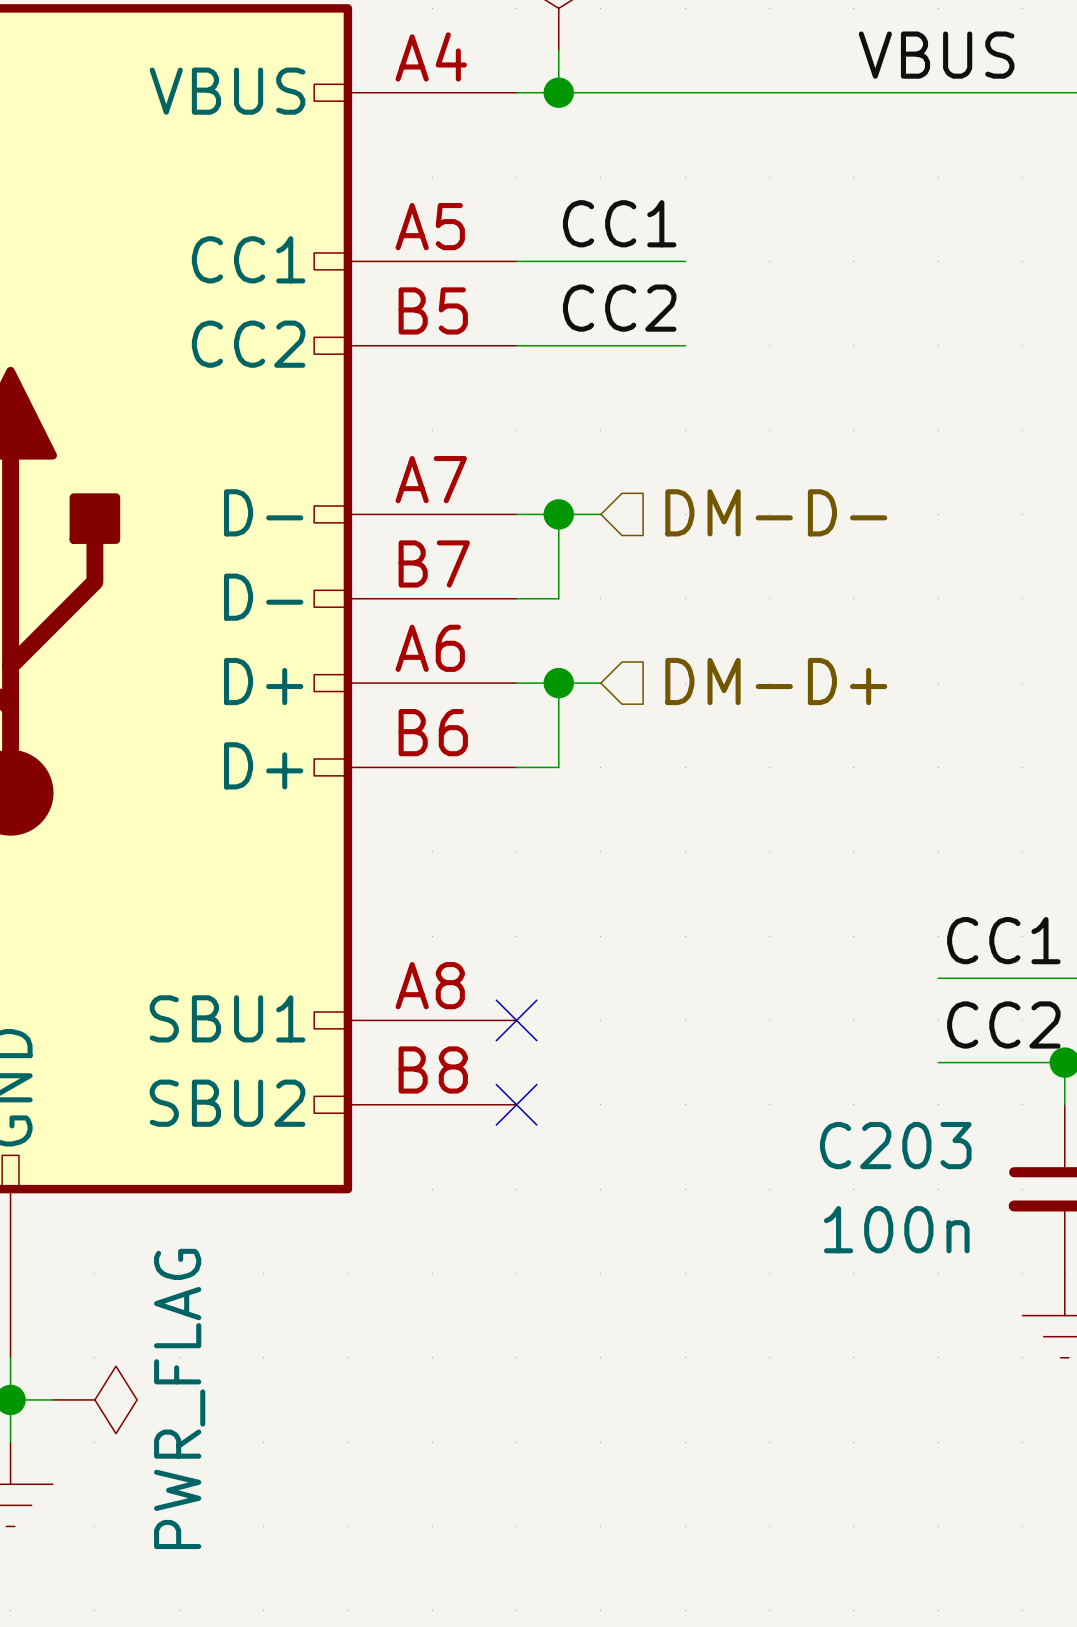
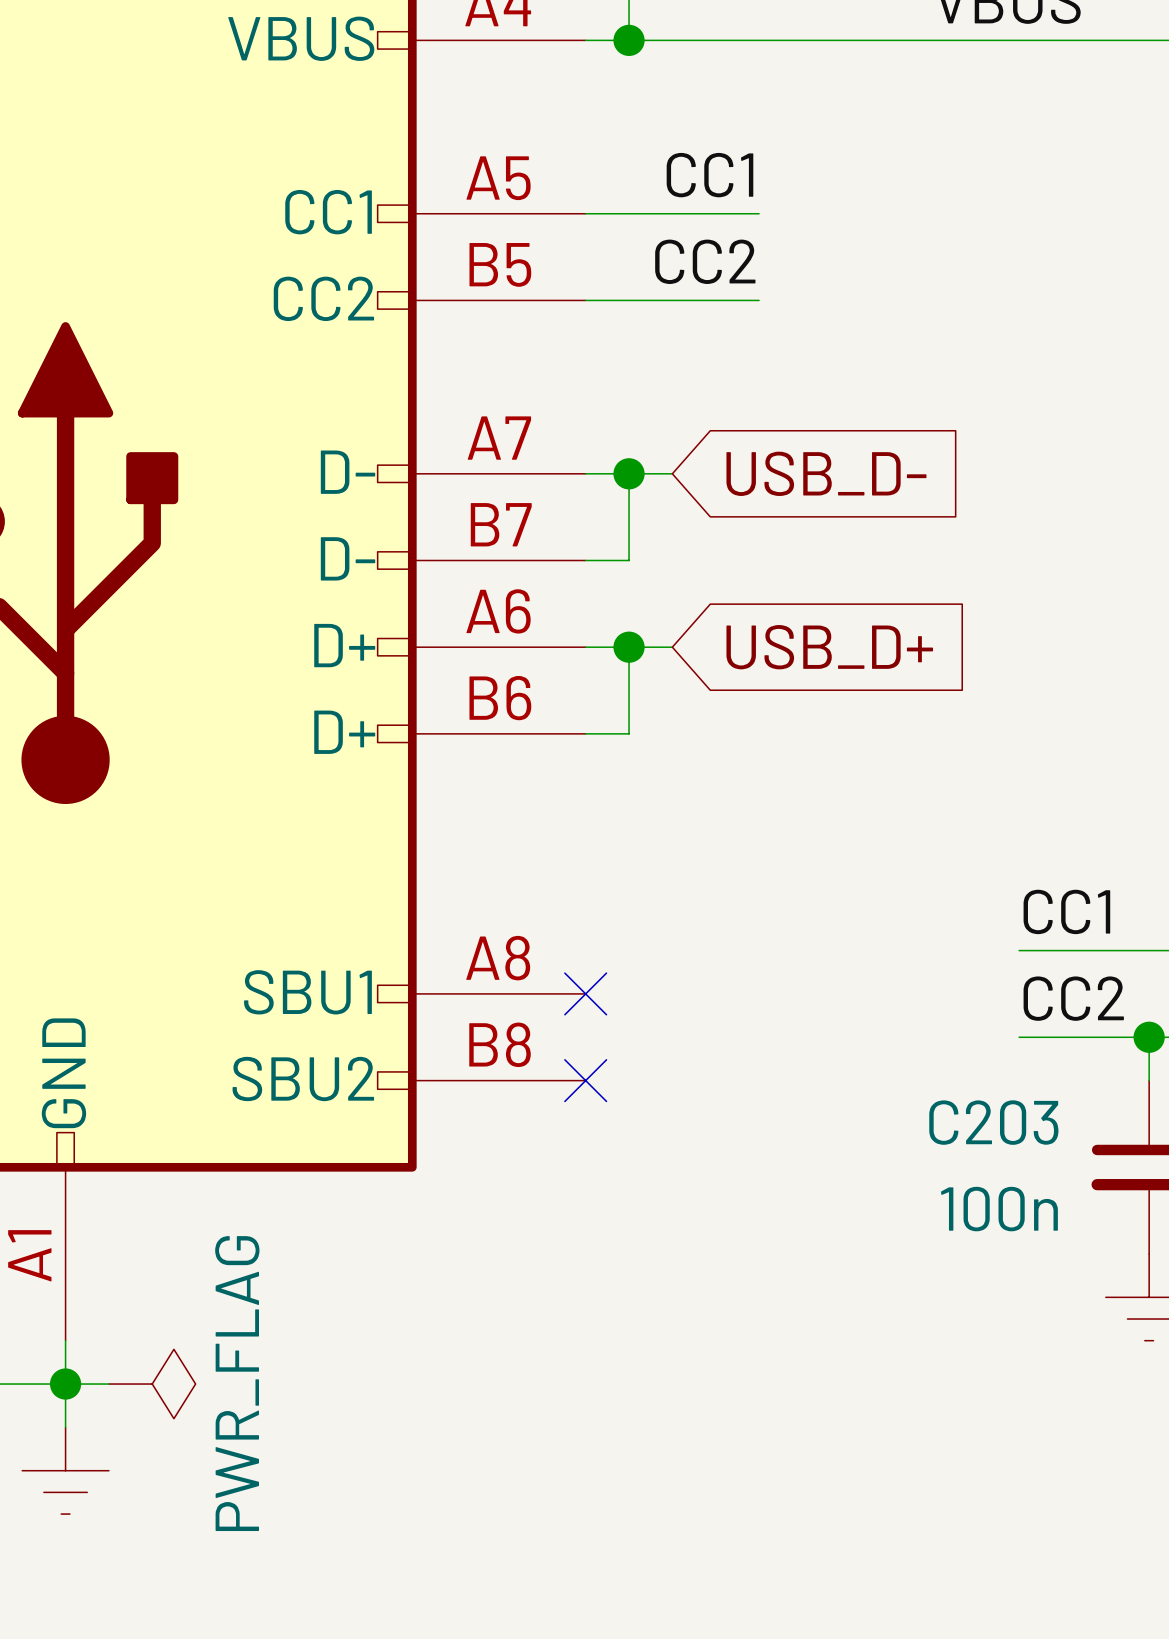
hierarchical label: DM-D- (776, 512) -> none
global label: none -> USB_D- (826, 473)
hierarchical label: DM-D+ (776, 681) -> none
global label: none -> USB_D+ (829, 647)

